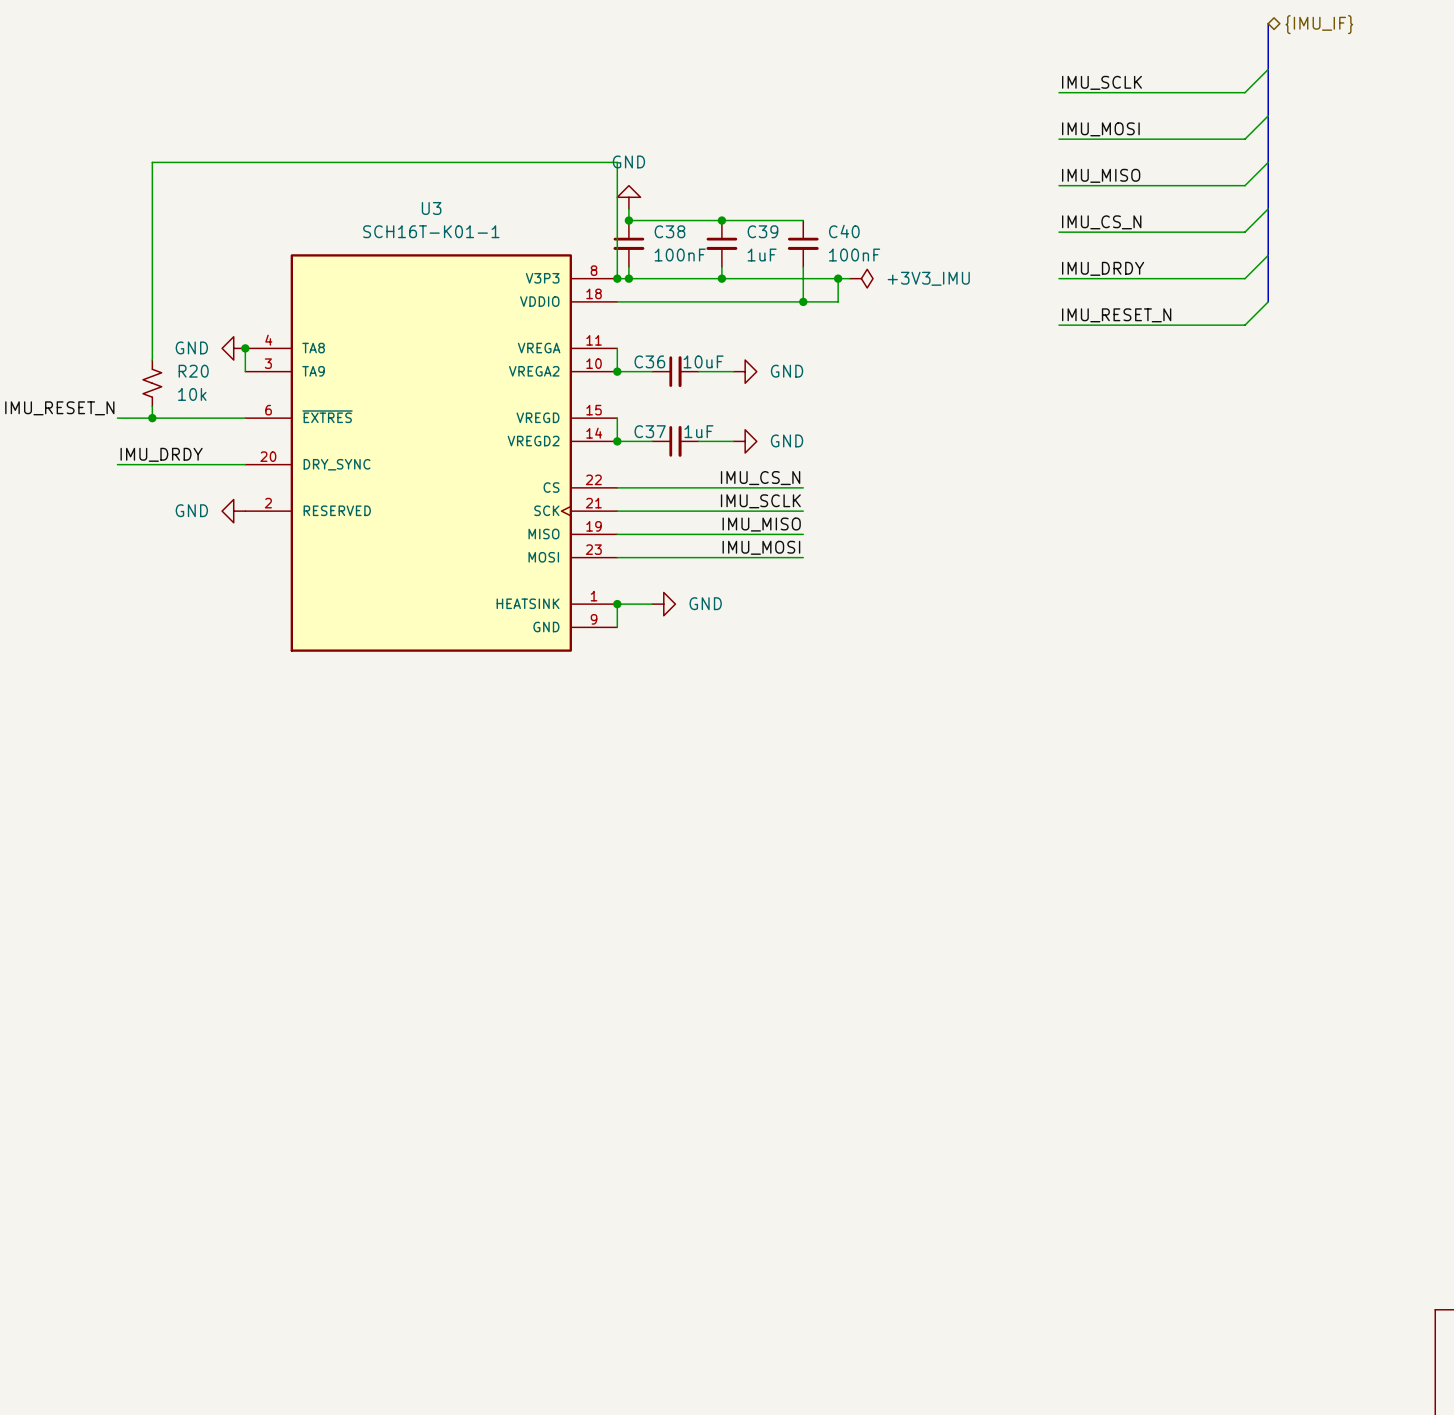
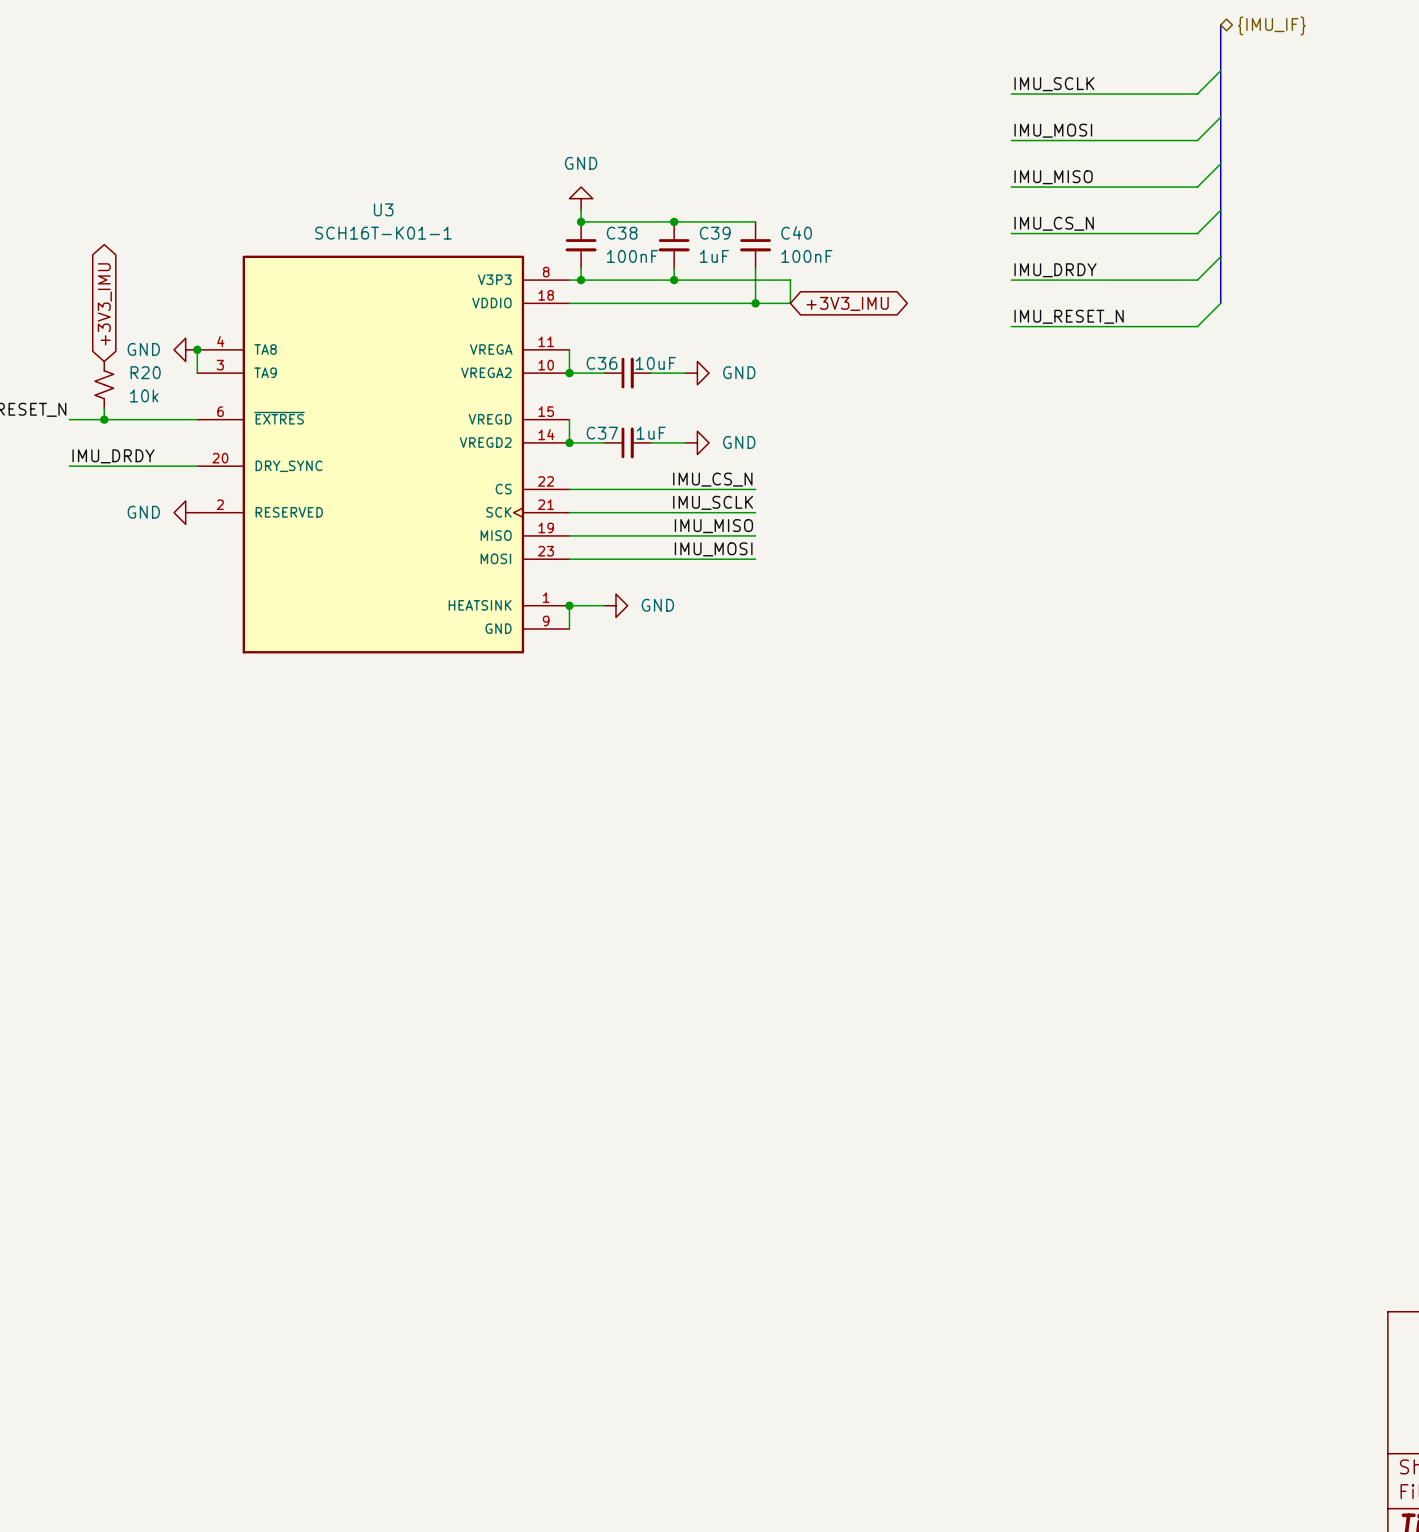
wire: (617, 278) (617, 162) (152, 162) (152, 360) -> none
junction: (617, 278) -> none
wire: (838, 278) (849, 278) -> none
junction: (838, 278) -> none
power symbol: +3V3_IMU (861, 278) -> none
global label: none -> +3V3_IMU (104, 304)
global label: none -> +3V3_IMU (847, 303)

